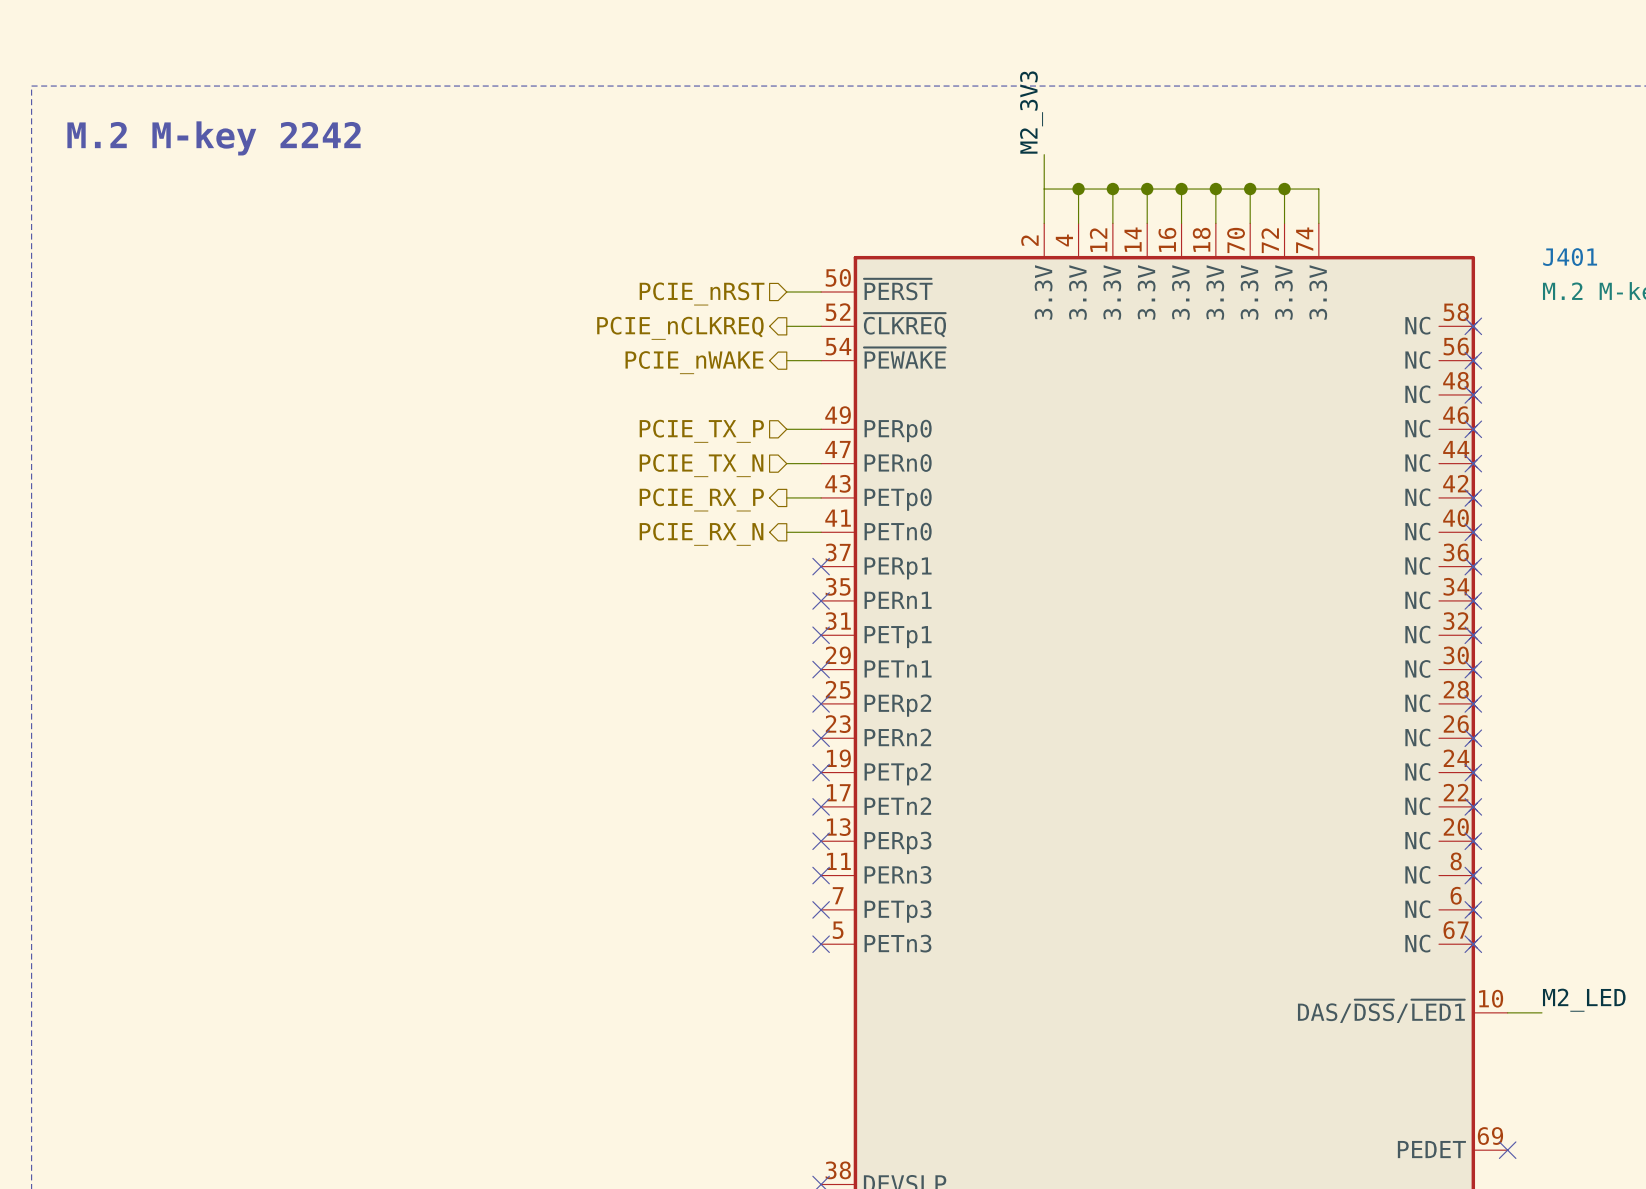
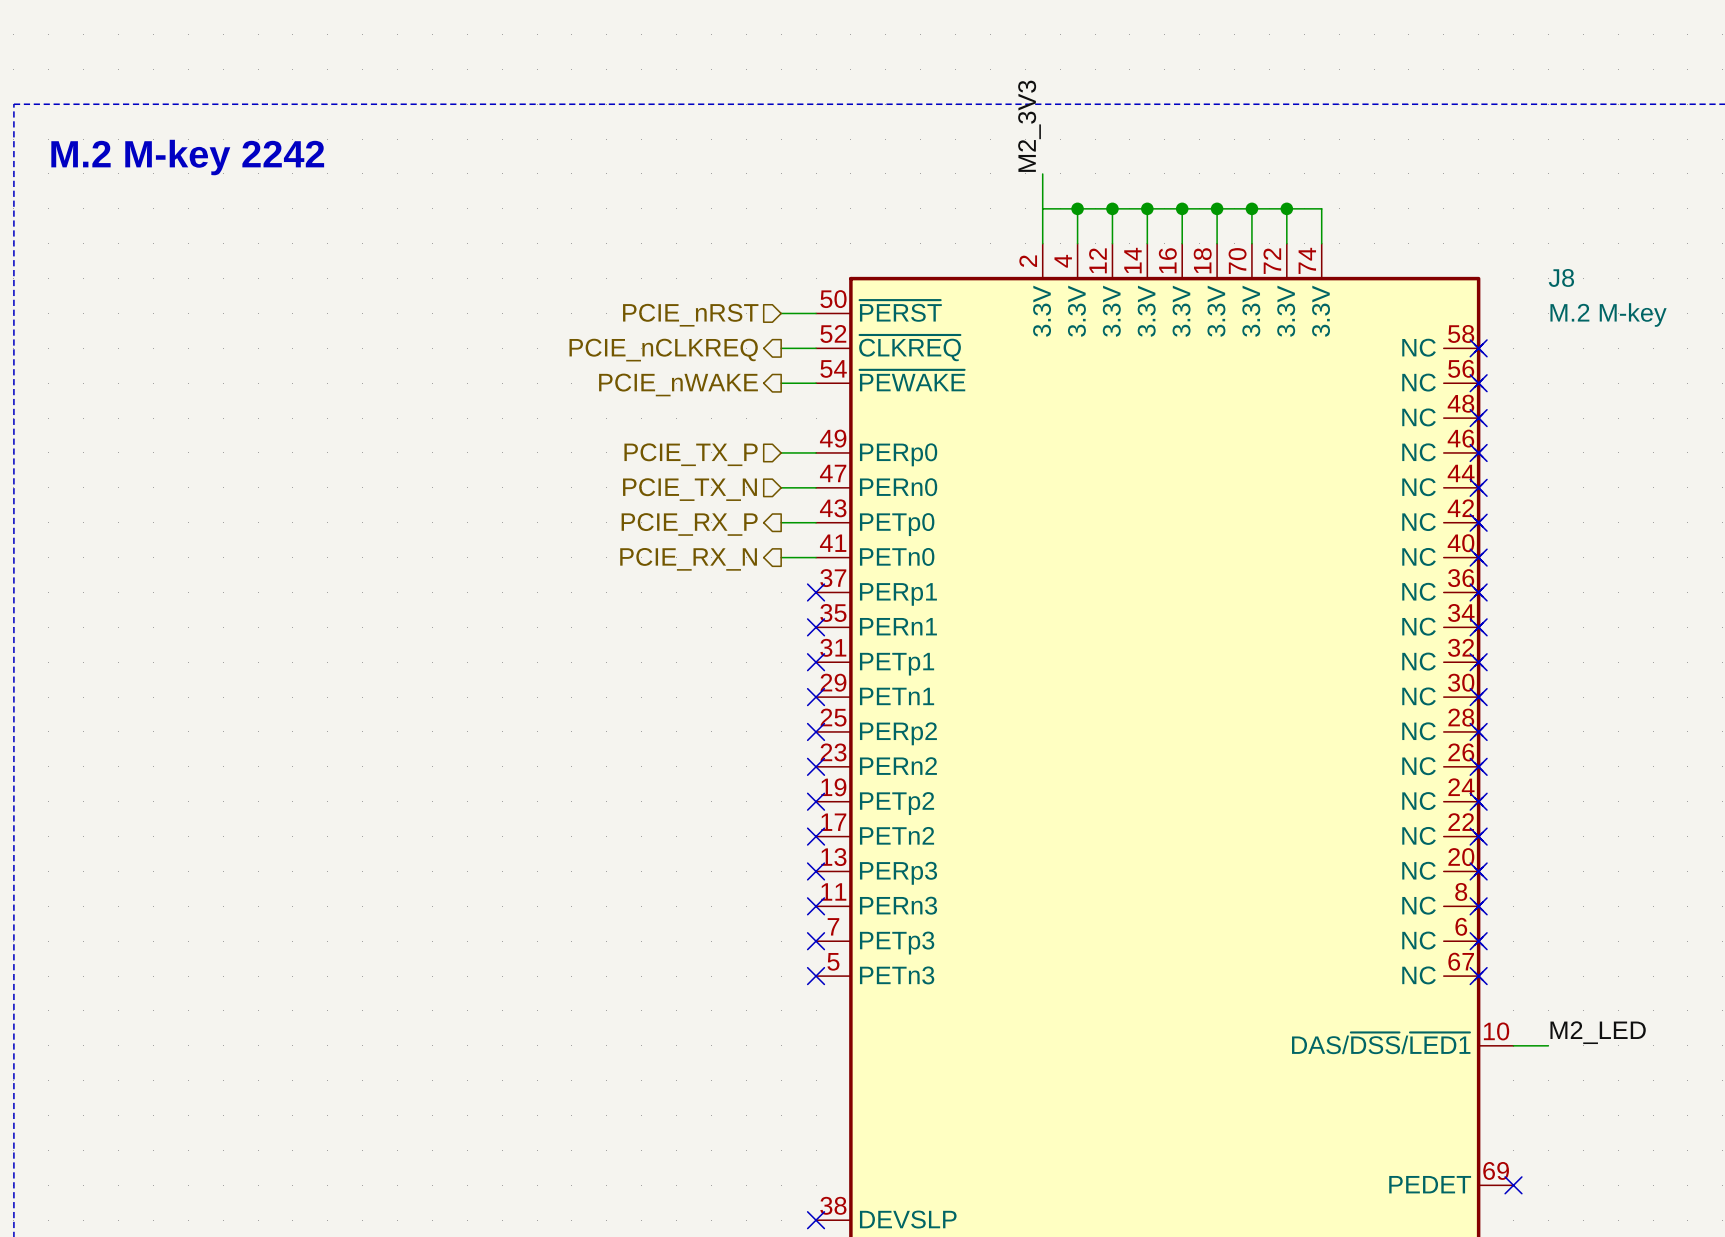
J401 name: J401 (1570, 257) -> J8 (1561, 277)

